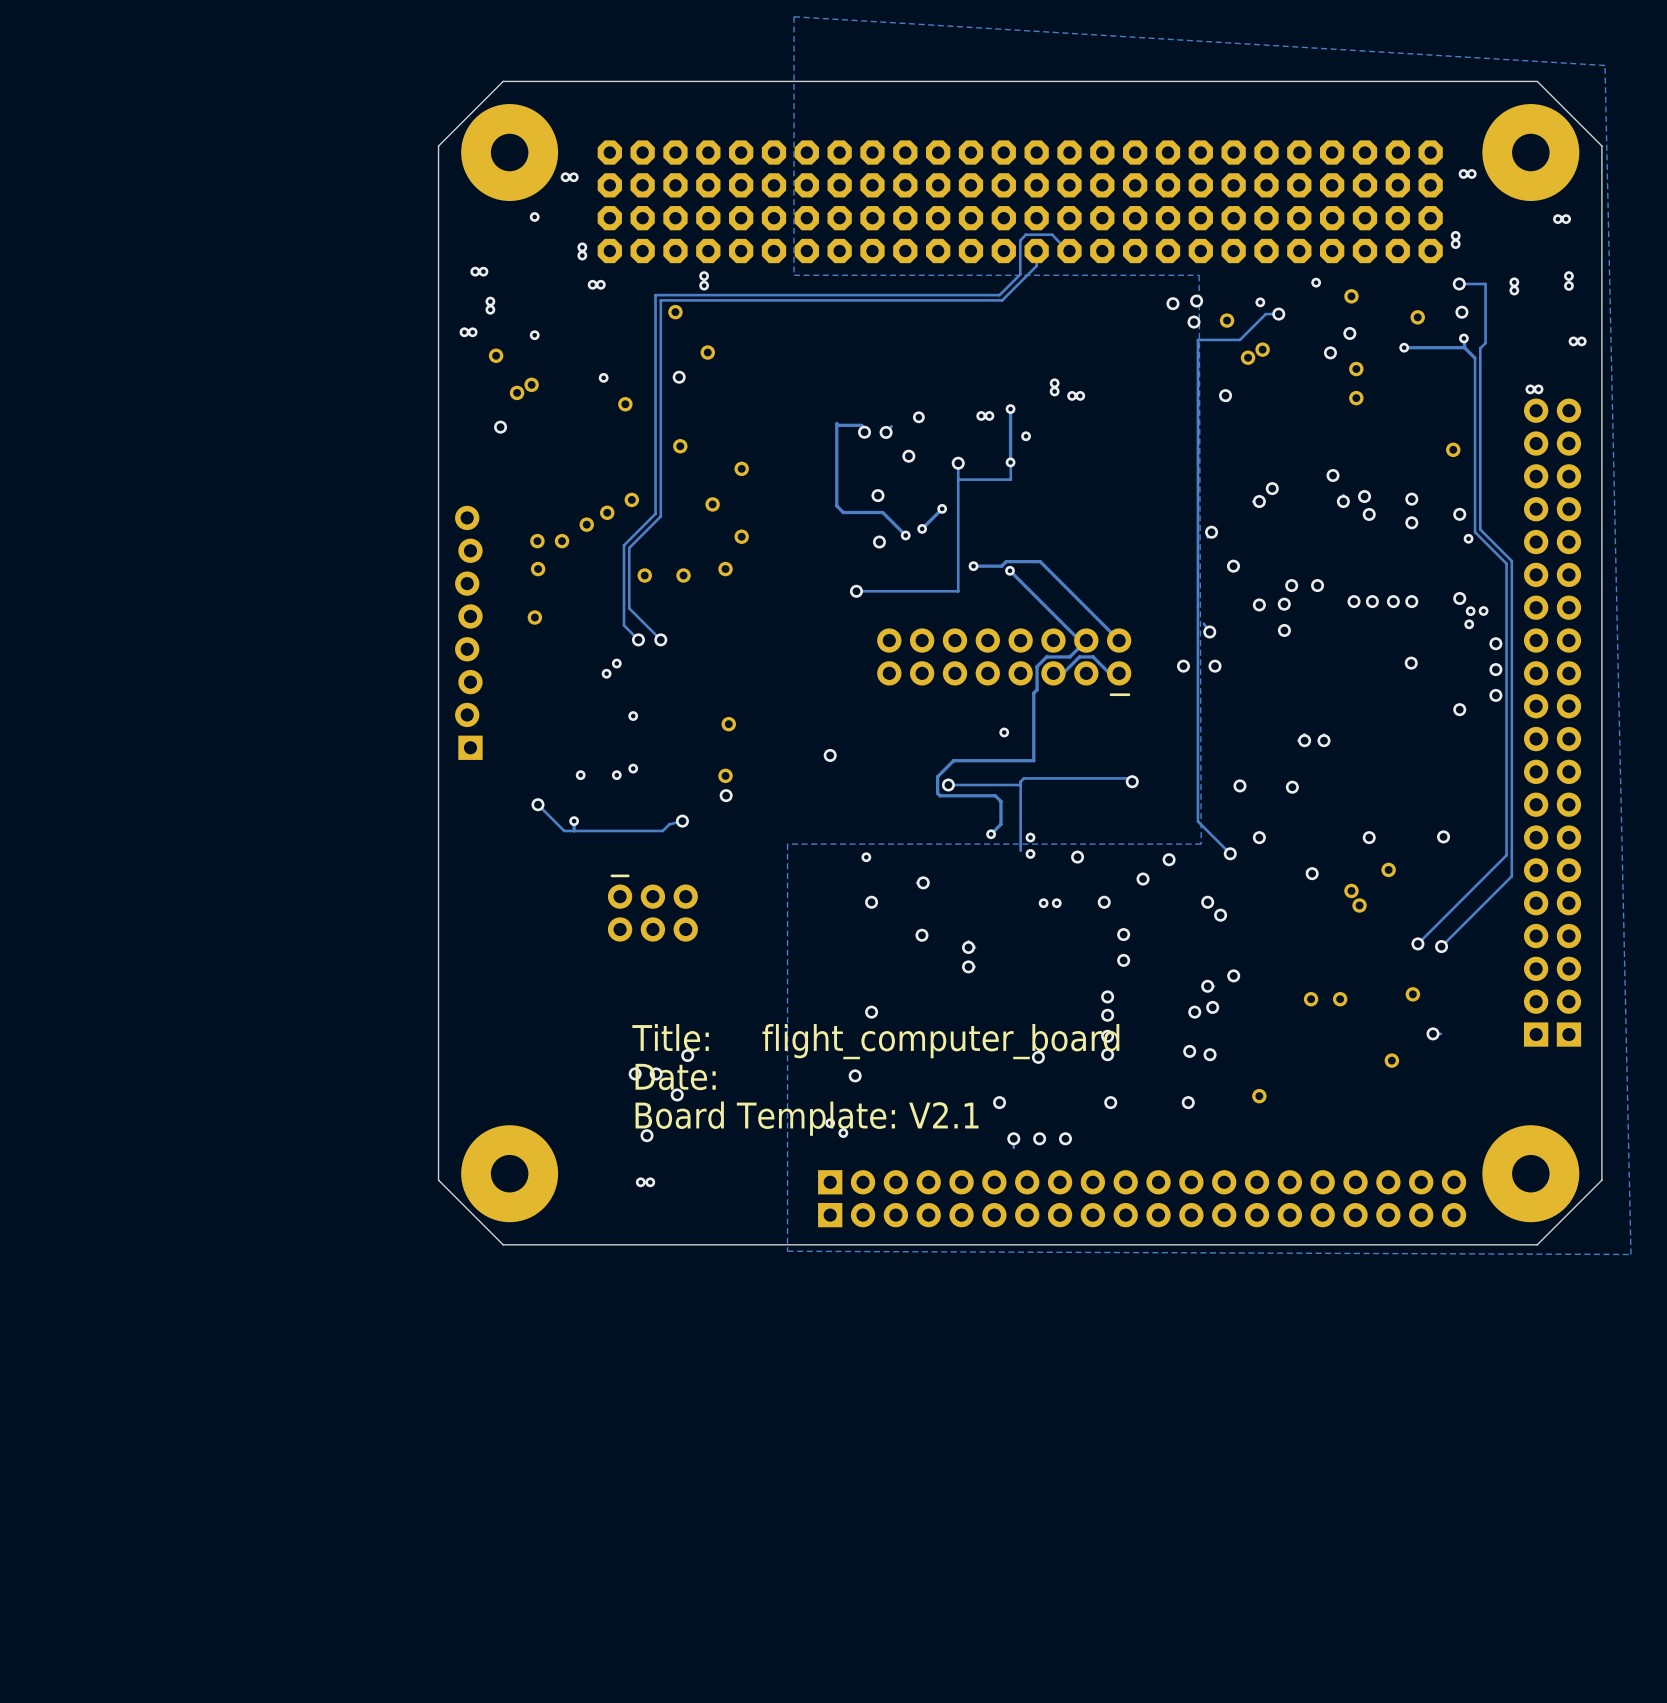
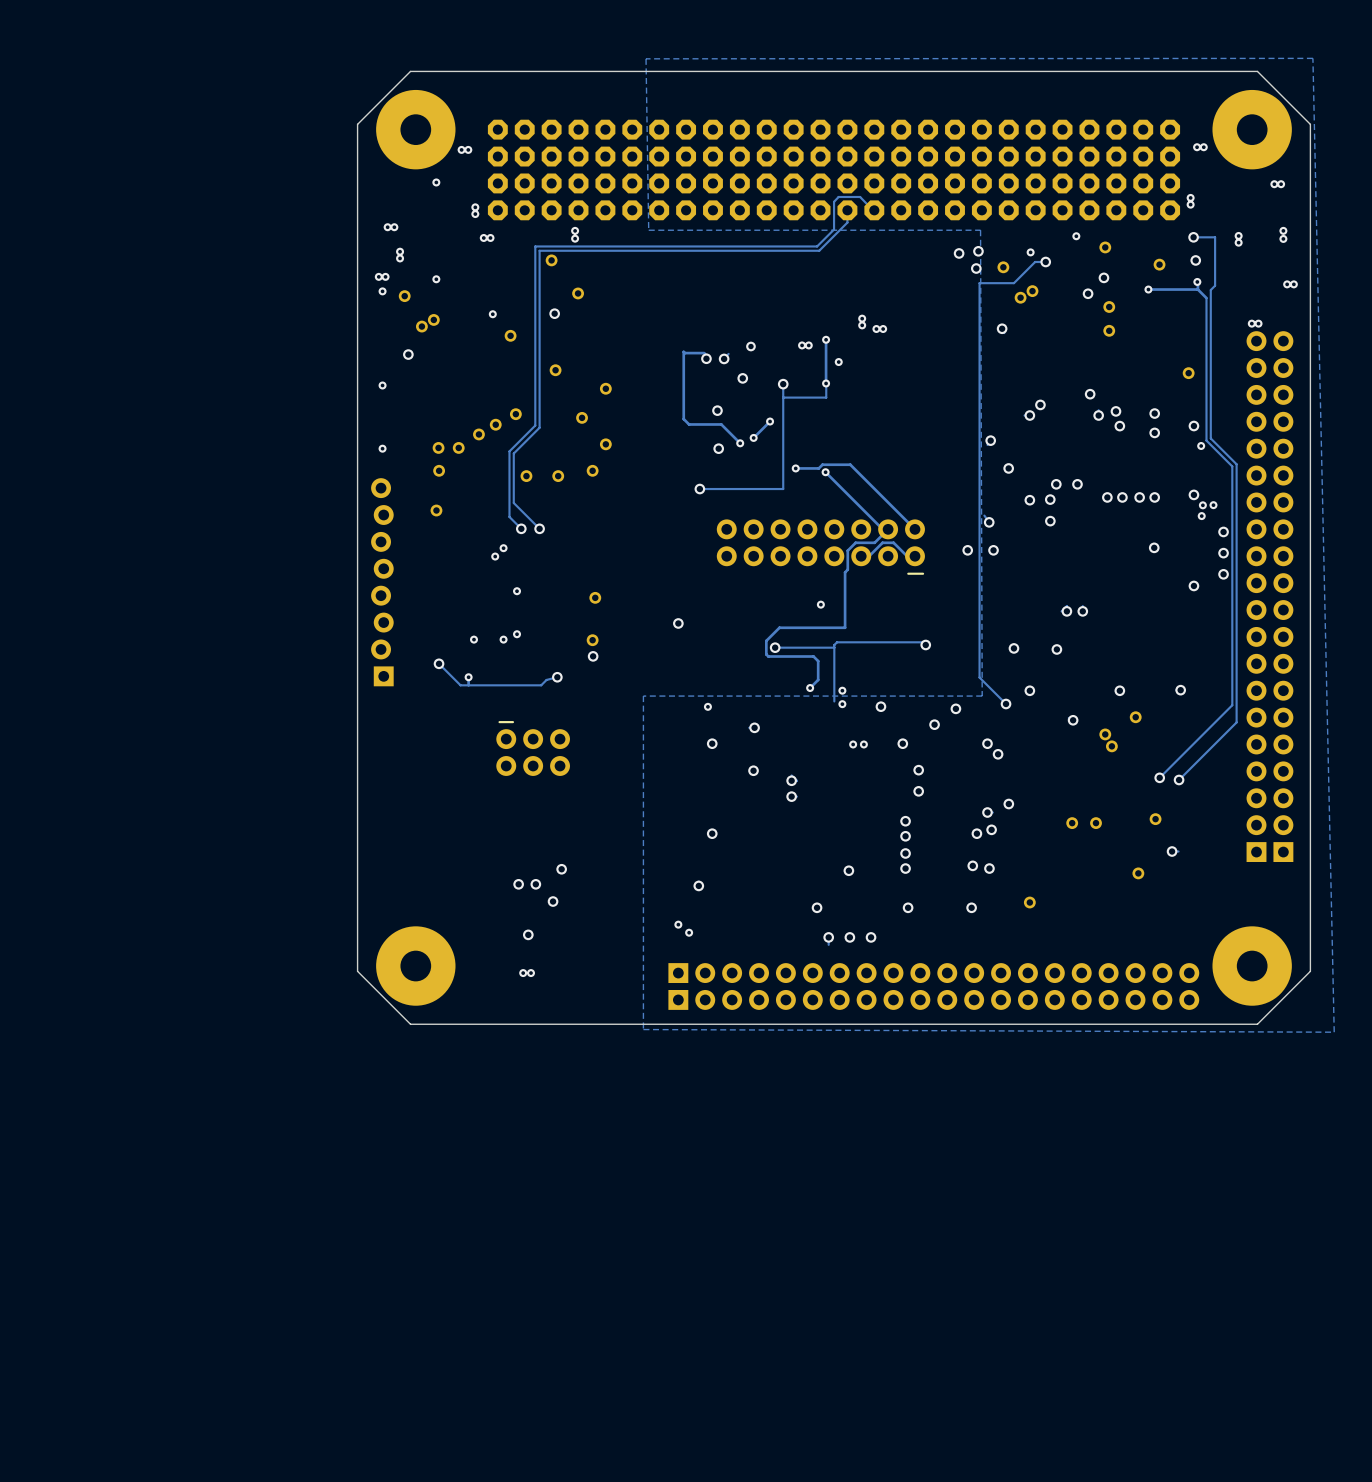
zone outline: (1604, 65) (794, 16) (794, 275) -> (1312, 58) (646, 58) (648, 230)
via: none -> (382, 291)
via: none -> (382, 385)
via: none -> (382, 448)
part position: (468, 632) -> (382, 582)
part text: Title: (670, 1037) -> none
part text: flight_computer_board (940, 1041) -> none
part text: Date: (675, 1077) -> none
part text: Board Template: V2.1 (807, 1118) -> none

